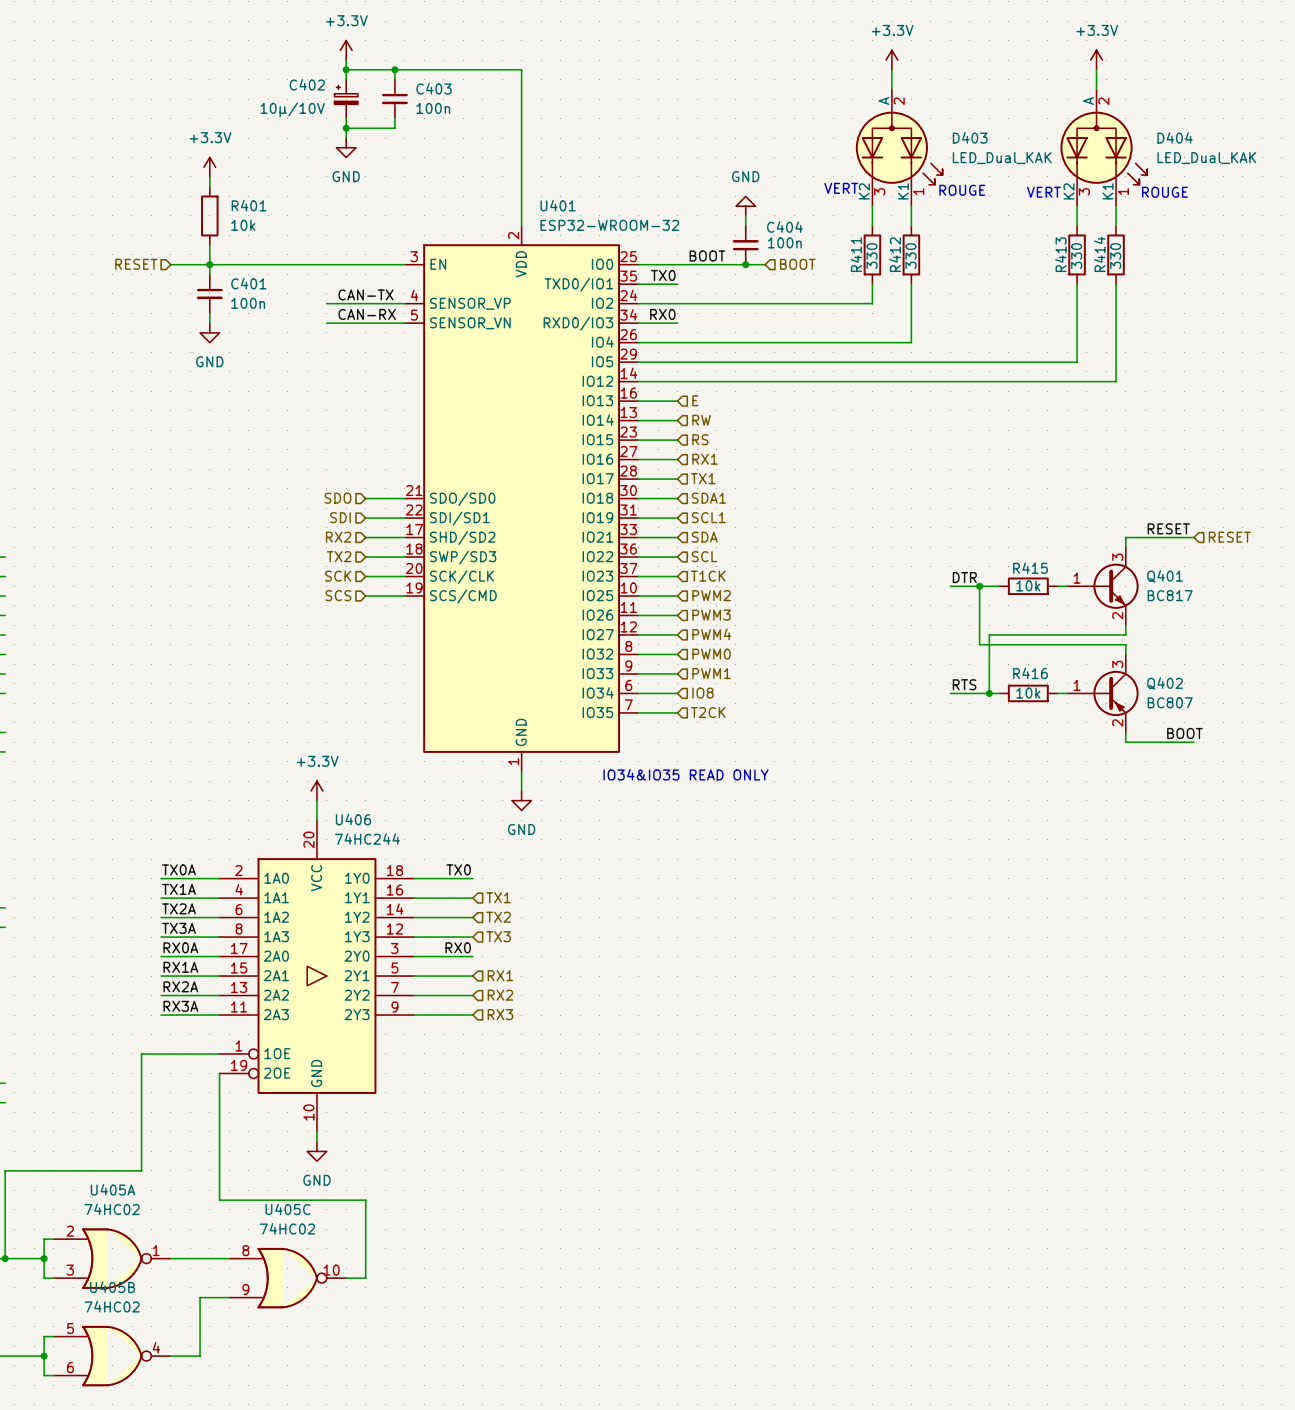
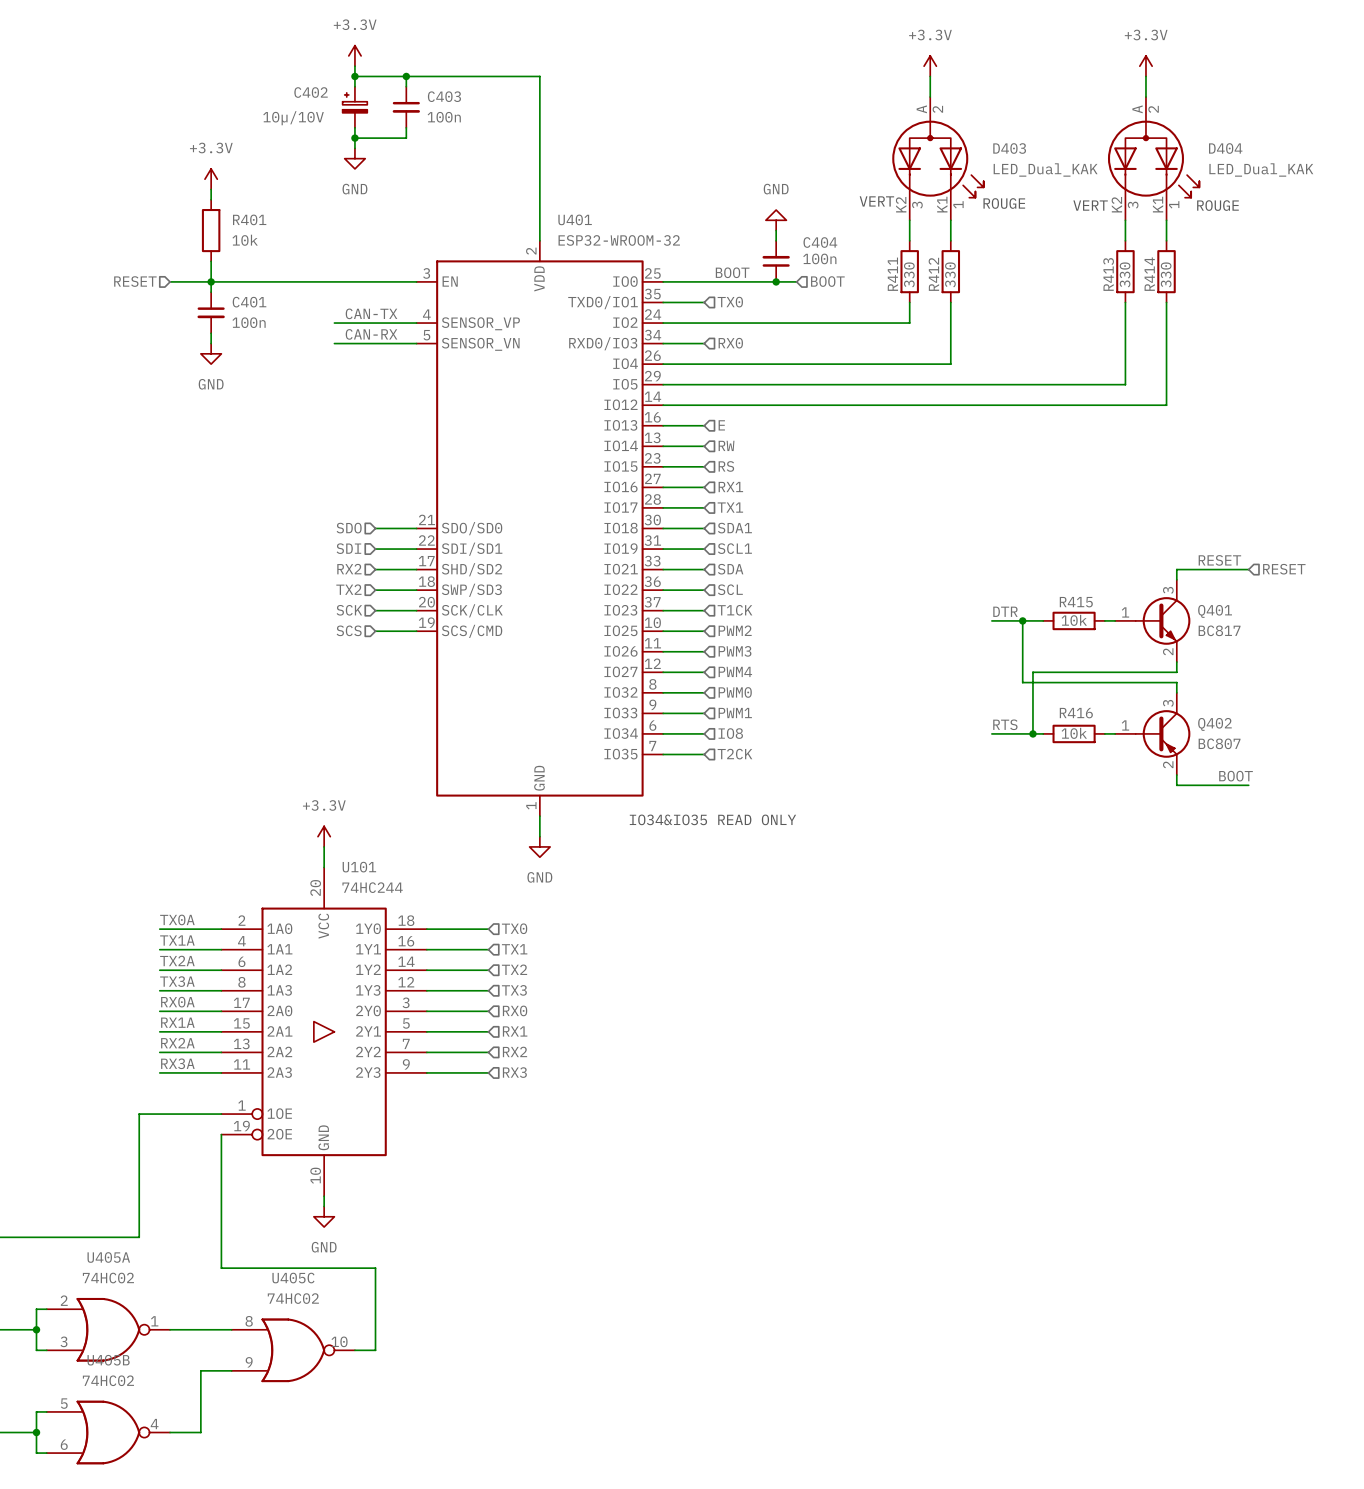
label: TX0 (663, 275) -> none
hierarchical label: none -> TX0 (730, 302)
label: RX0 (662, 314) -> none
hierarchical label: none -> RX0 (730, 343)
U406 name: U406 (353, 819) -> U101 (359, 867)
label: TX0 (458, 869) -> none
hierarchical label: none -> TX0 (514, 928)
label: RX0 (458, 947) -> none
hierarchical label: none -> RX0 (515, 1010)

